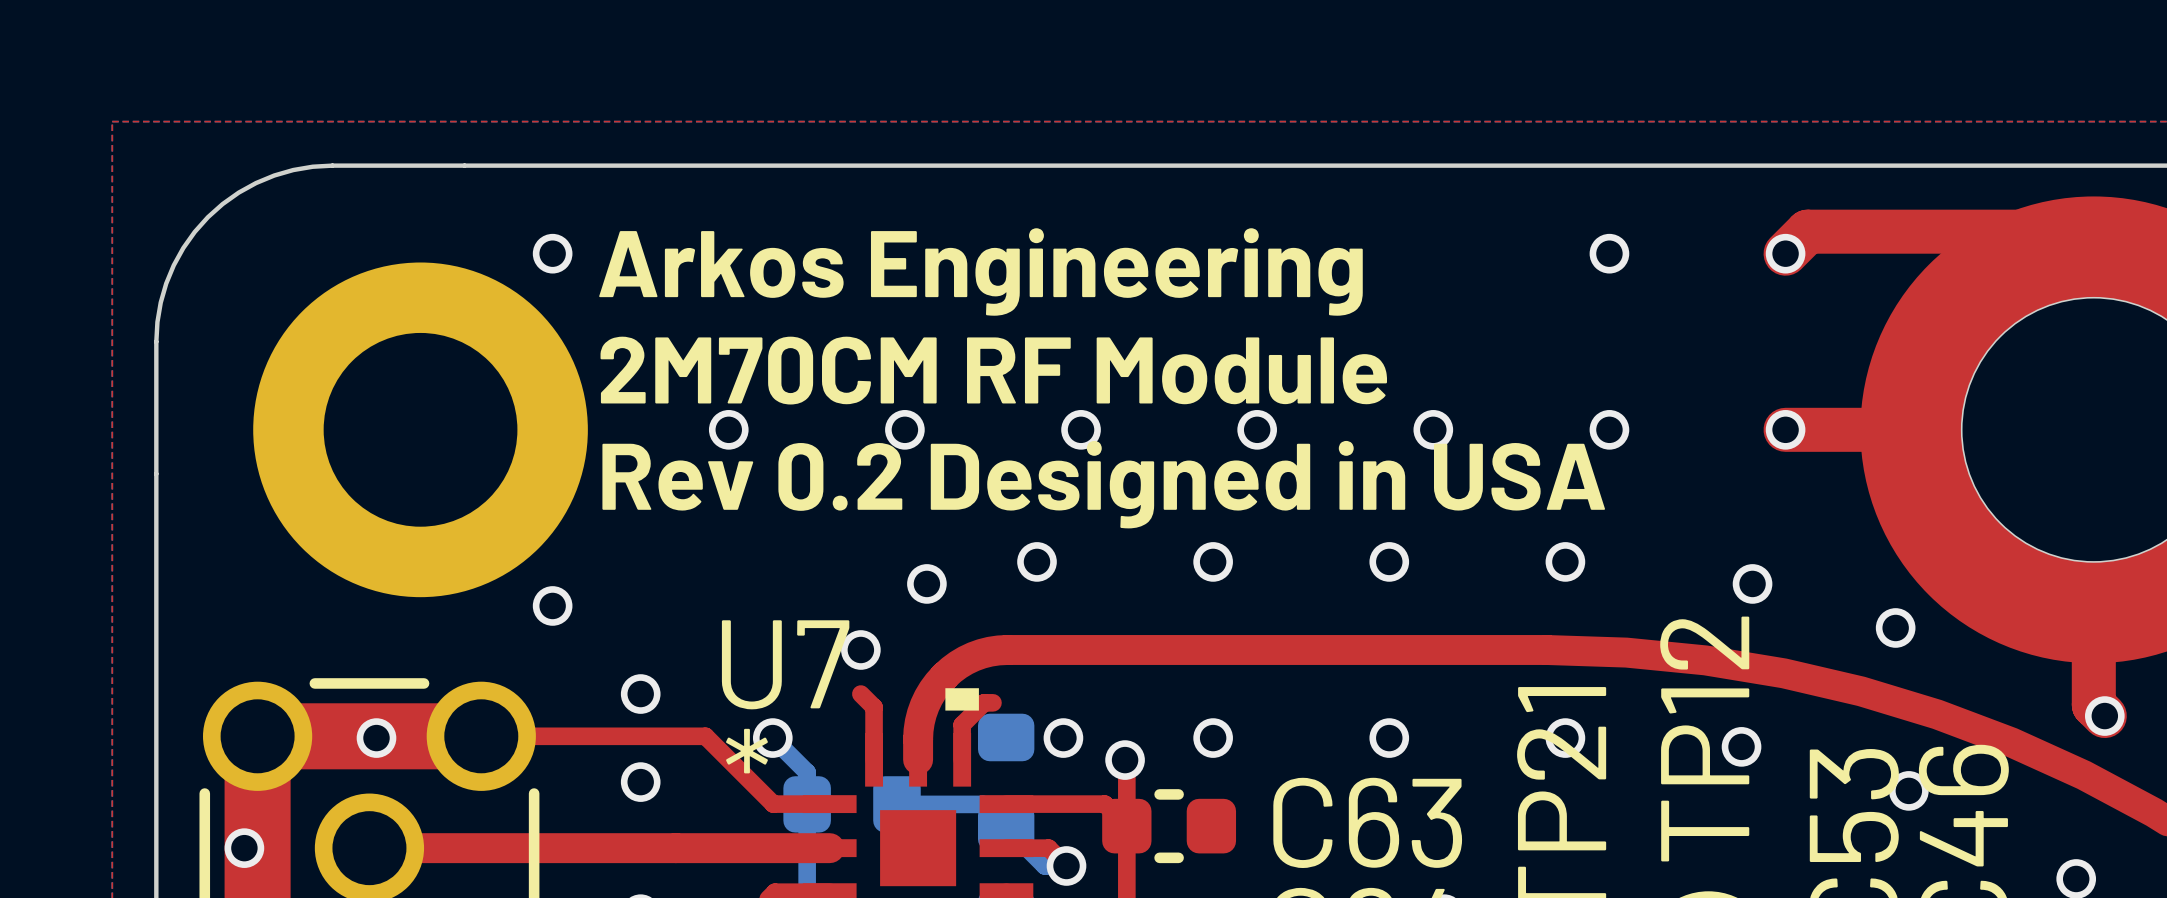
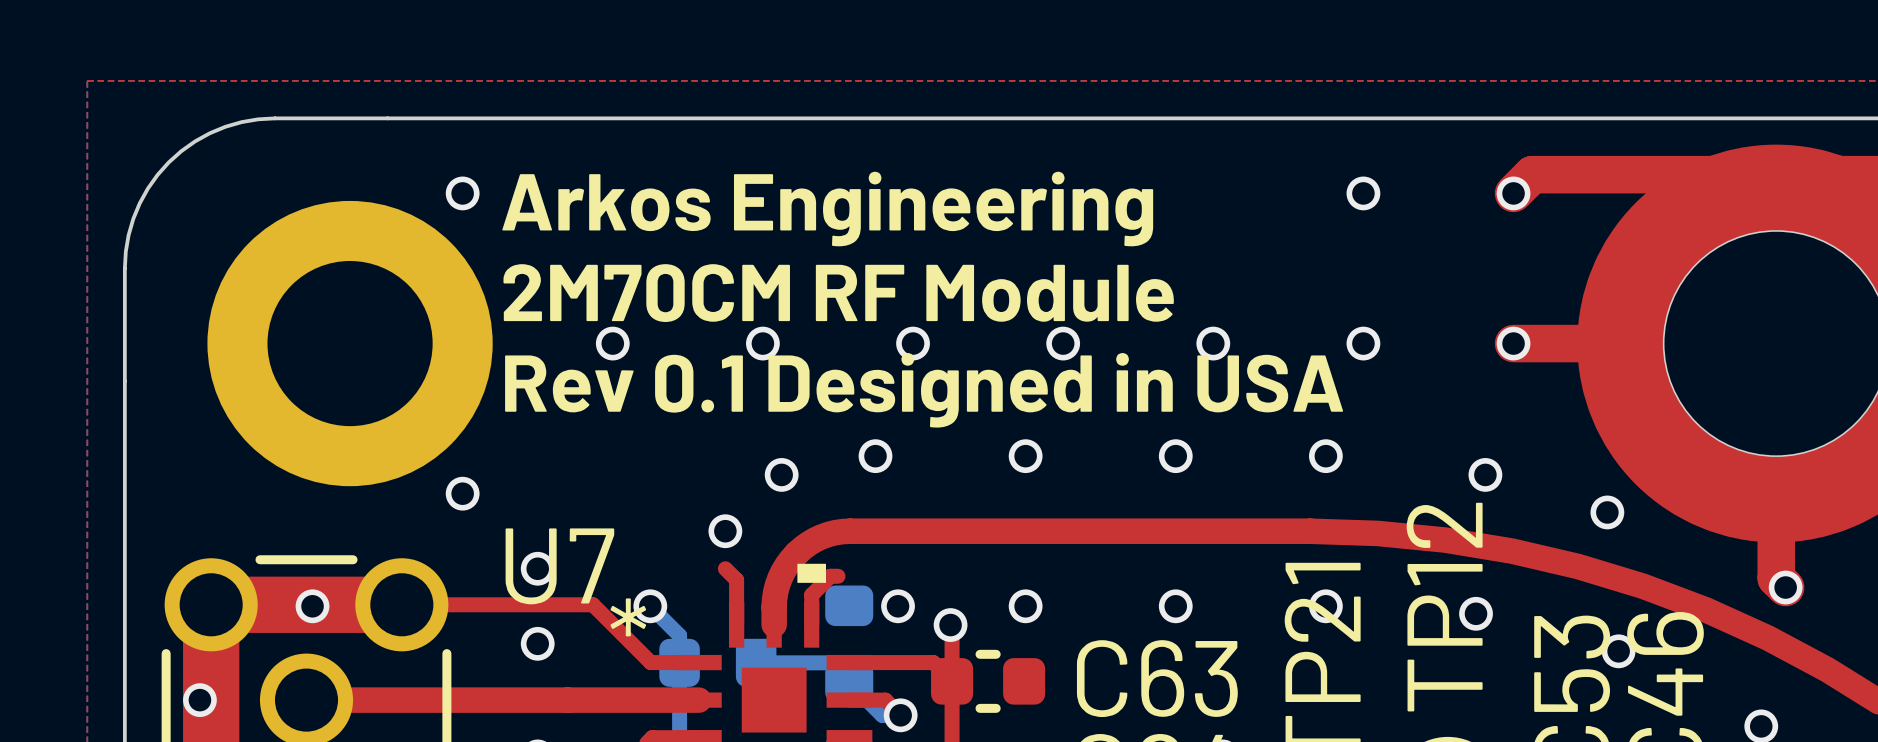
text: Rev 0.2 Designed in USA (1103, 484) -> Rev 0.1 Designed in USA (924, 390)
U7 name position: U7 (785, 664) -> U7 (559, 566)

